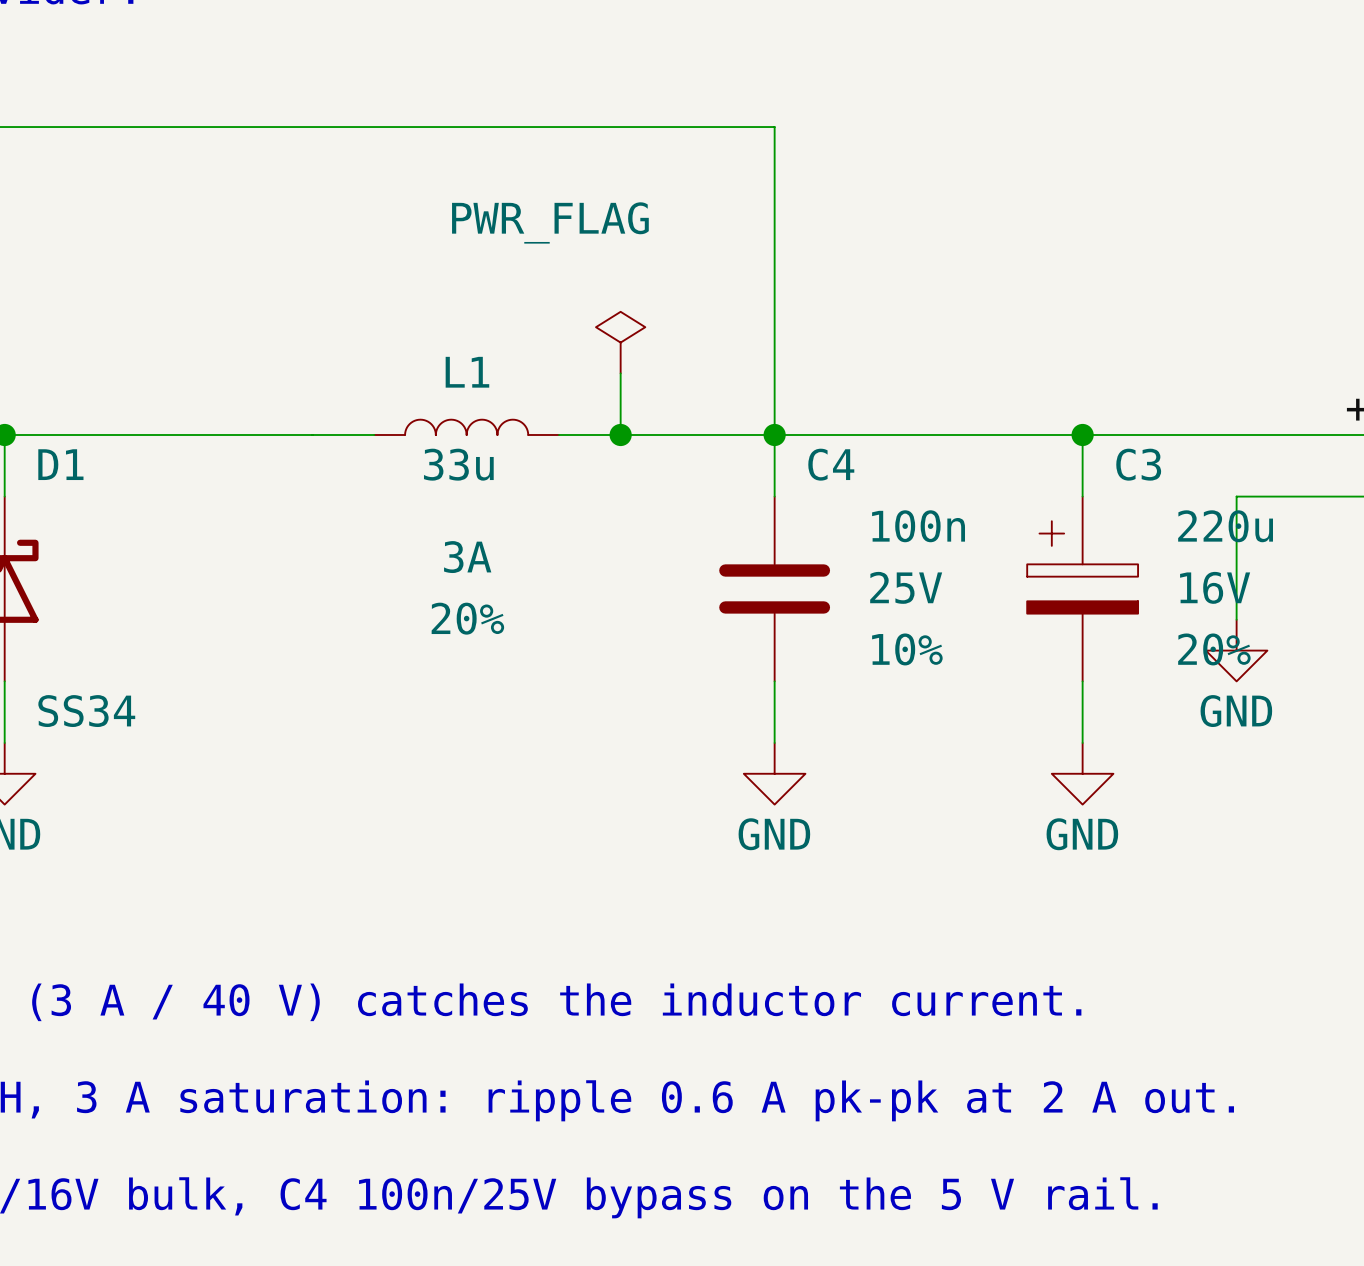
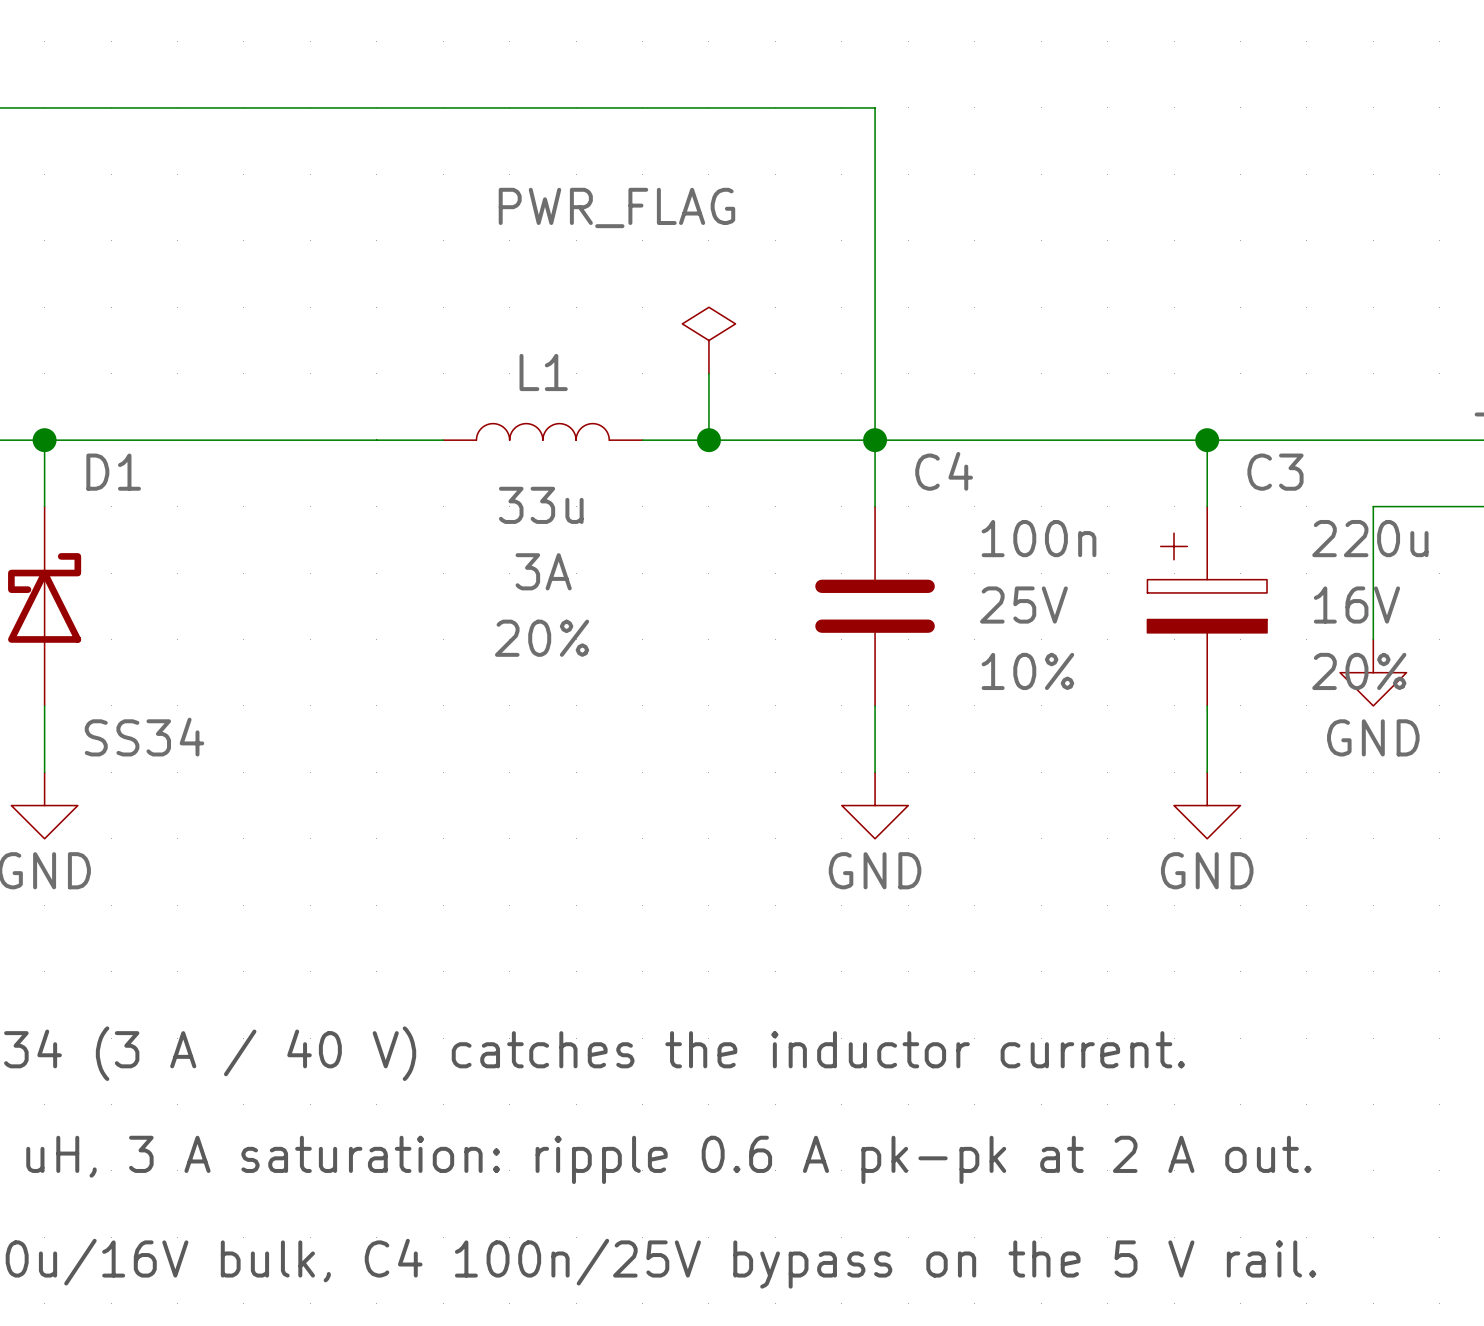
L1 value position: 33u (458, 464) -> 33u (541, 505)

